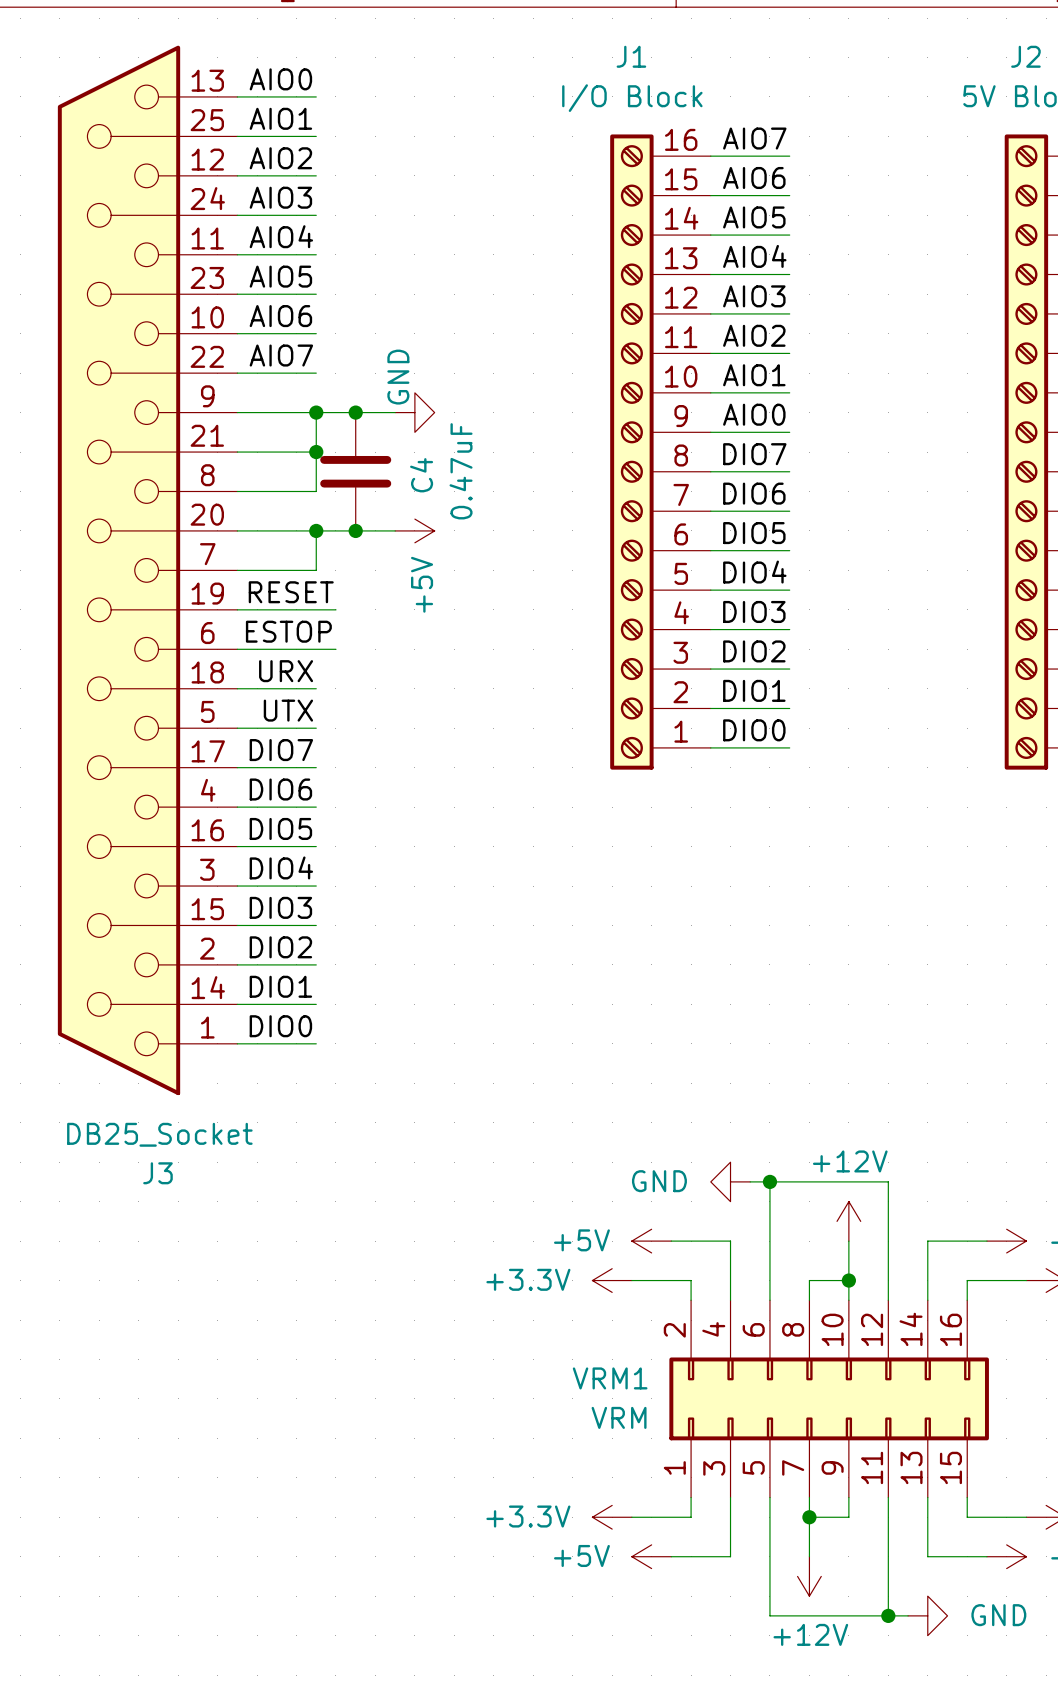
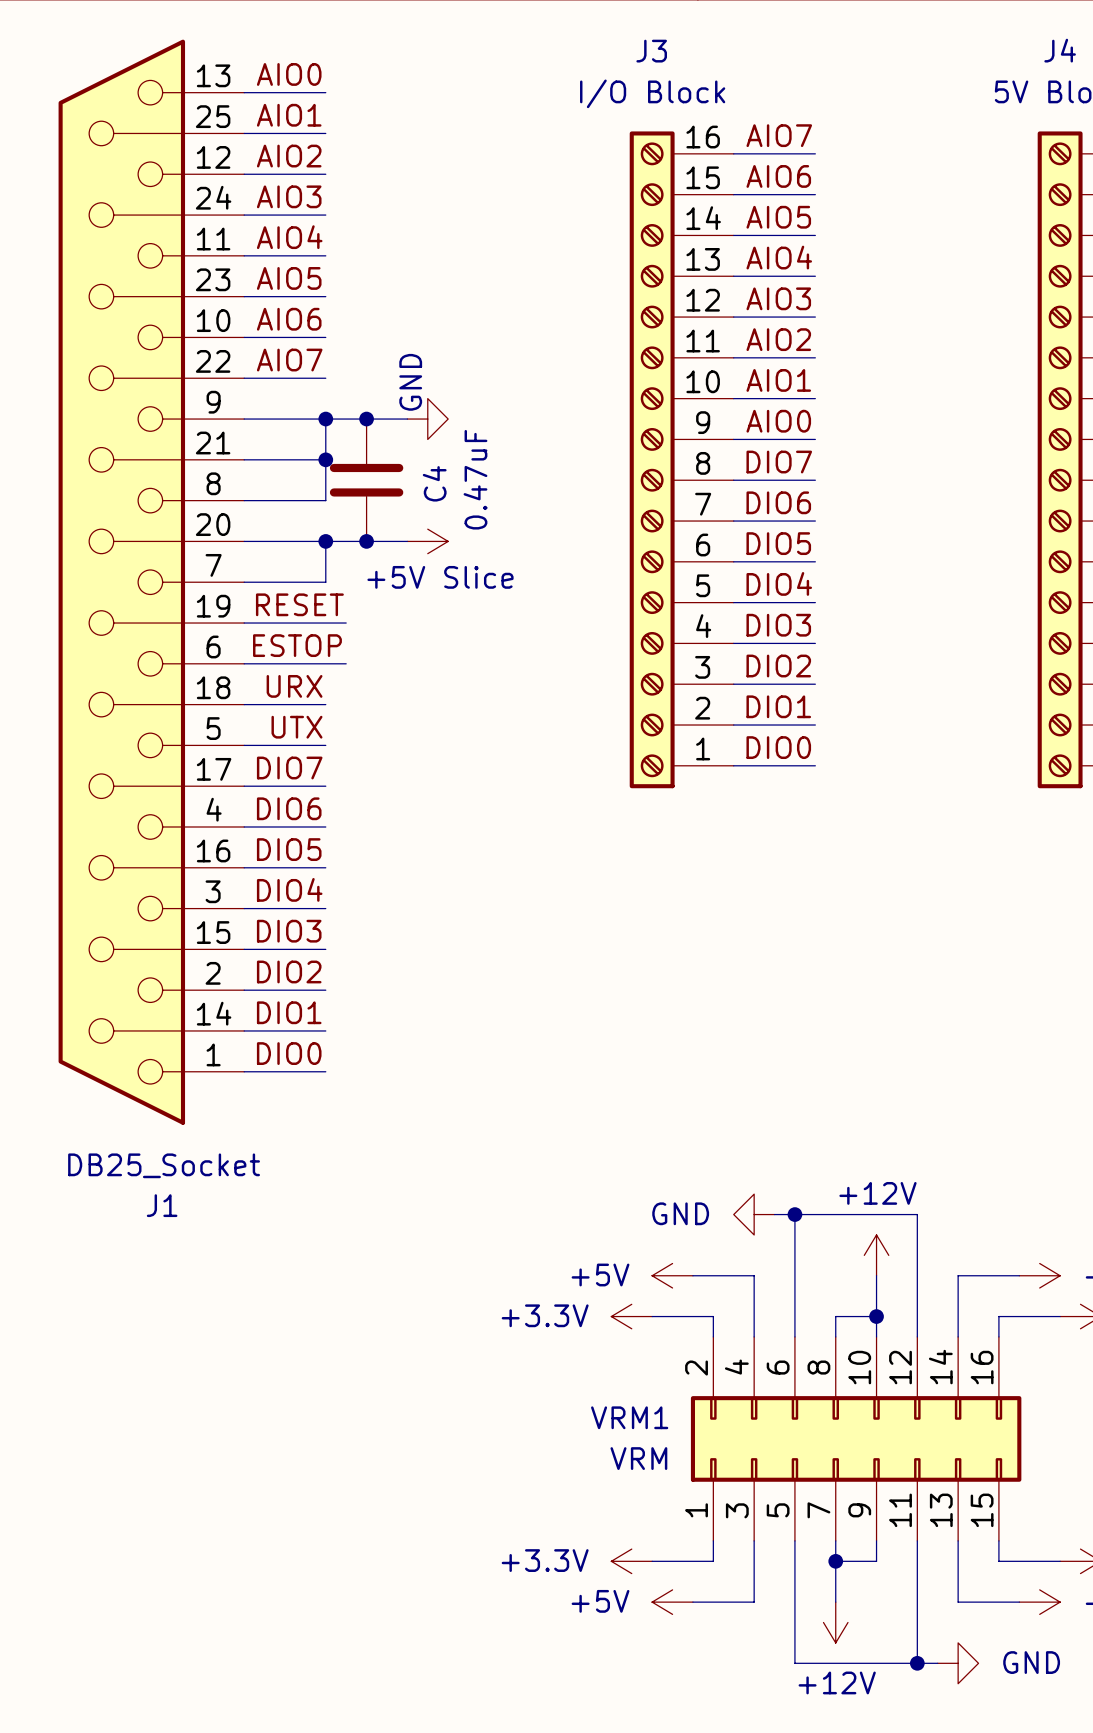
J1 name: J1 (631, 56) -> J3 (651, 51)
J2 name: J2 (1025, 56) -> J4 (1060, 50)
power symbol: +5V (414, 530) -> +5V Slice (427, 541)
J3 name: J3 (157, 1173) -> J1 (162, 1205)

